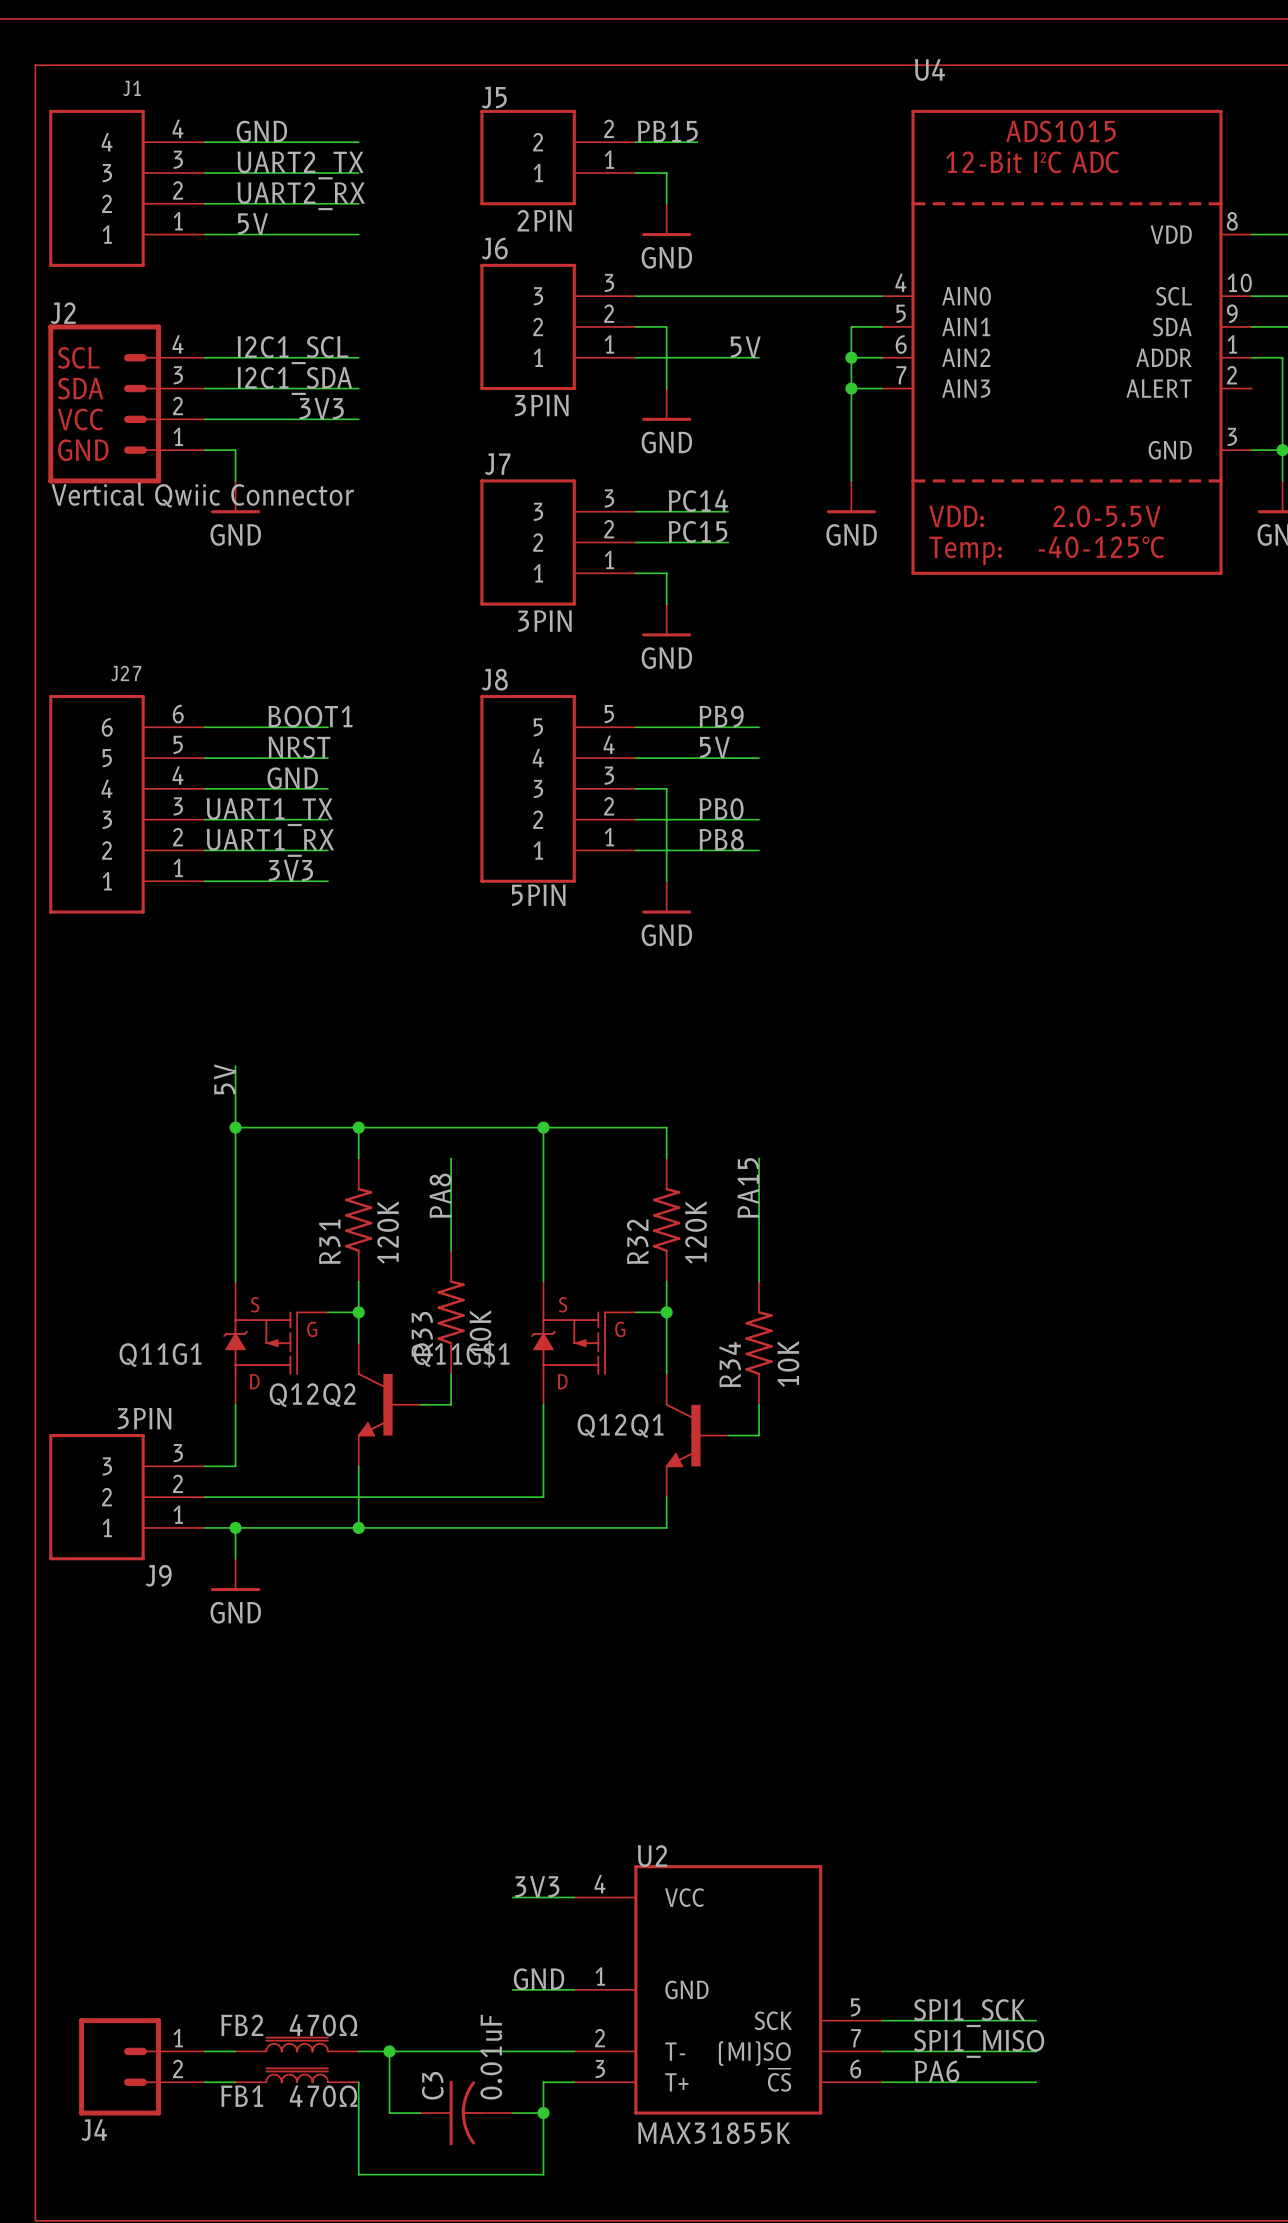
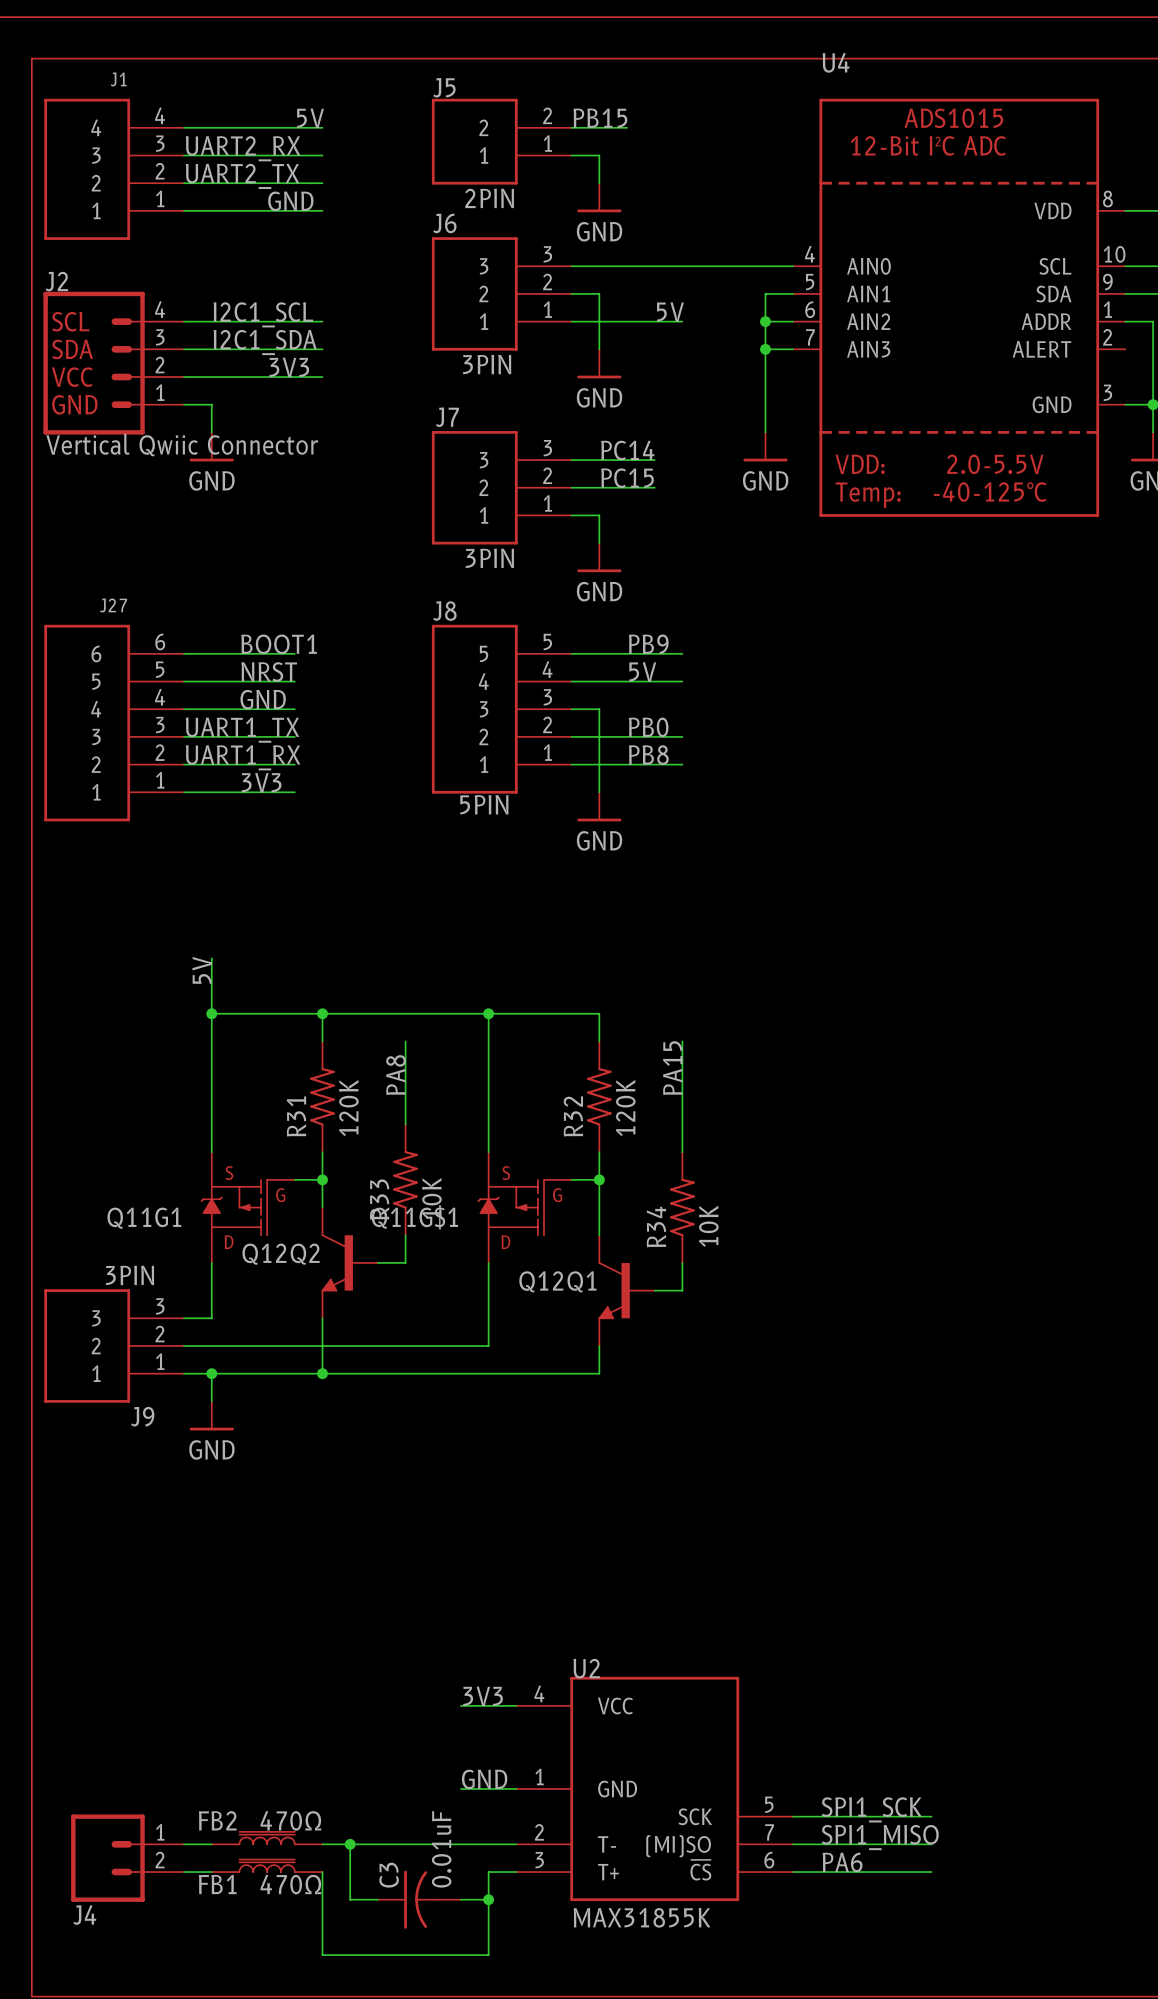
label position: GND (261, 131) -> GND (290, 201)
label position: UART2_TX (300, 165) -> UART2_TX (242, 176)
label position: UART2_RX (301, 196) -> UART2_RX (243, 148)
label position: 5V (253, 223) -> 5V (310, 118)

